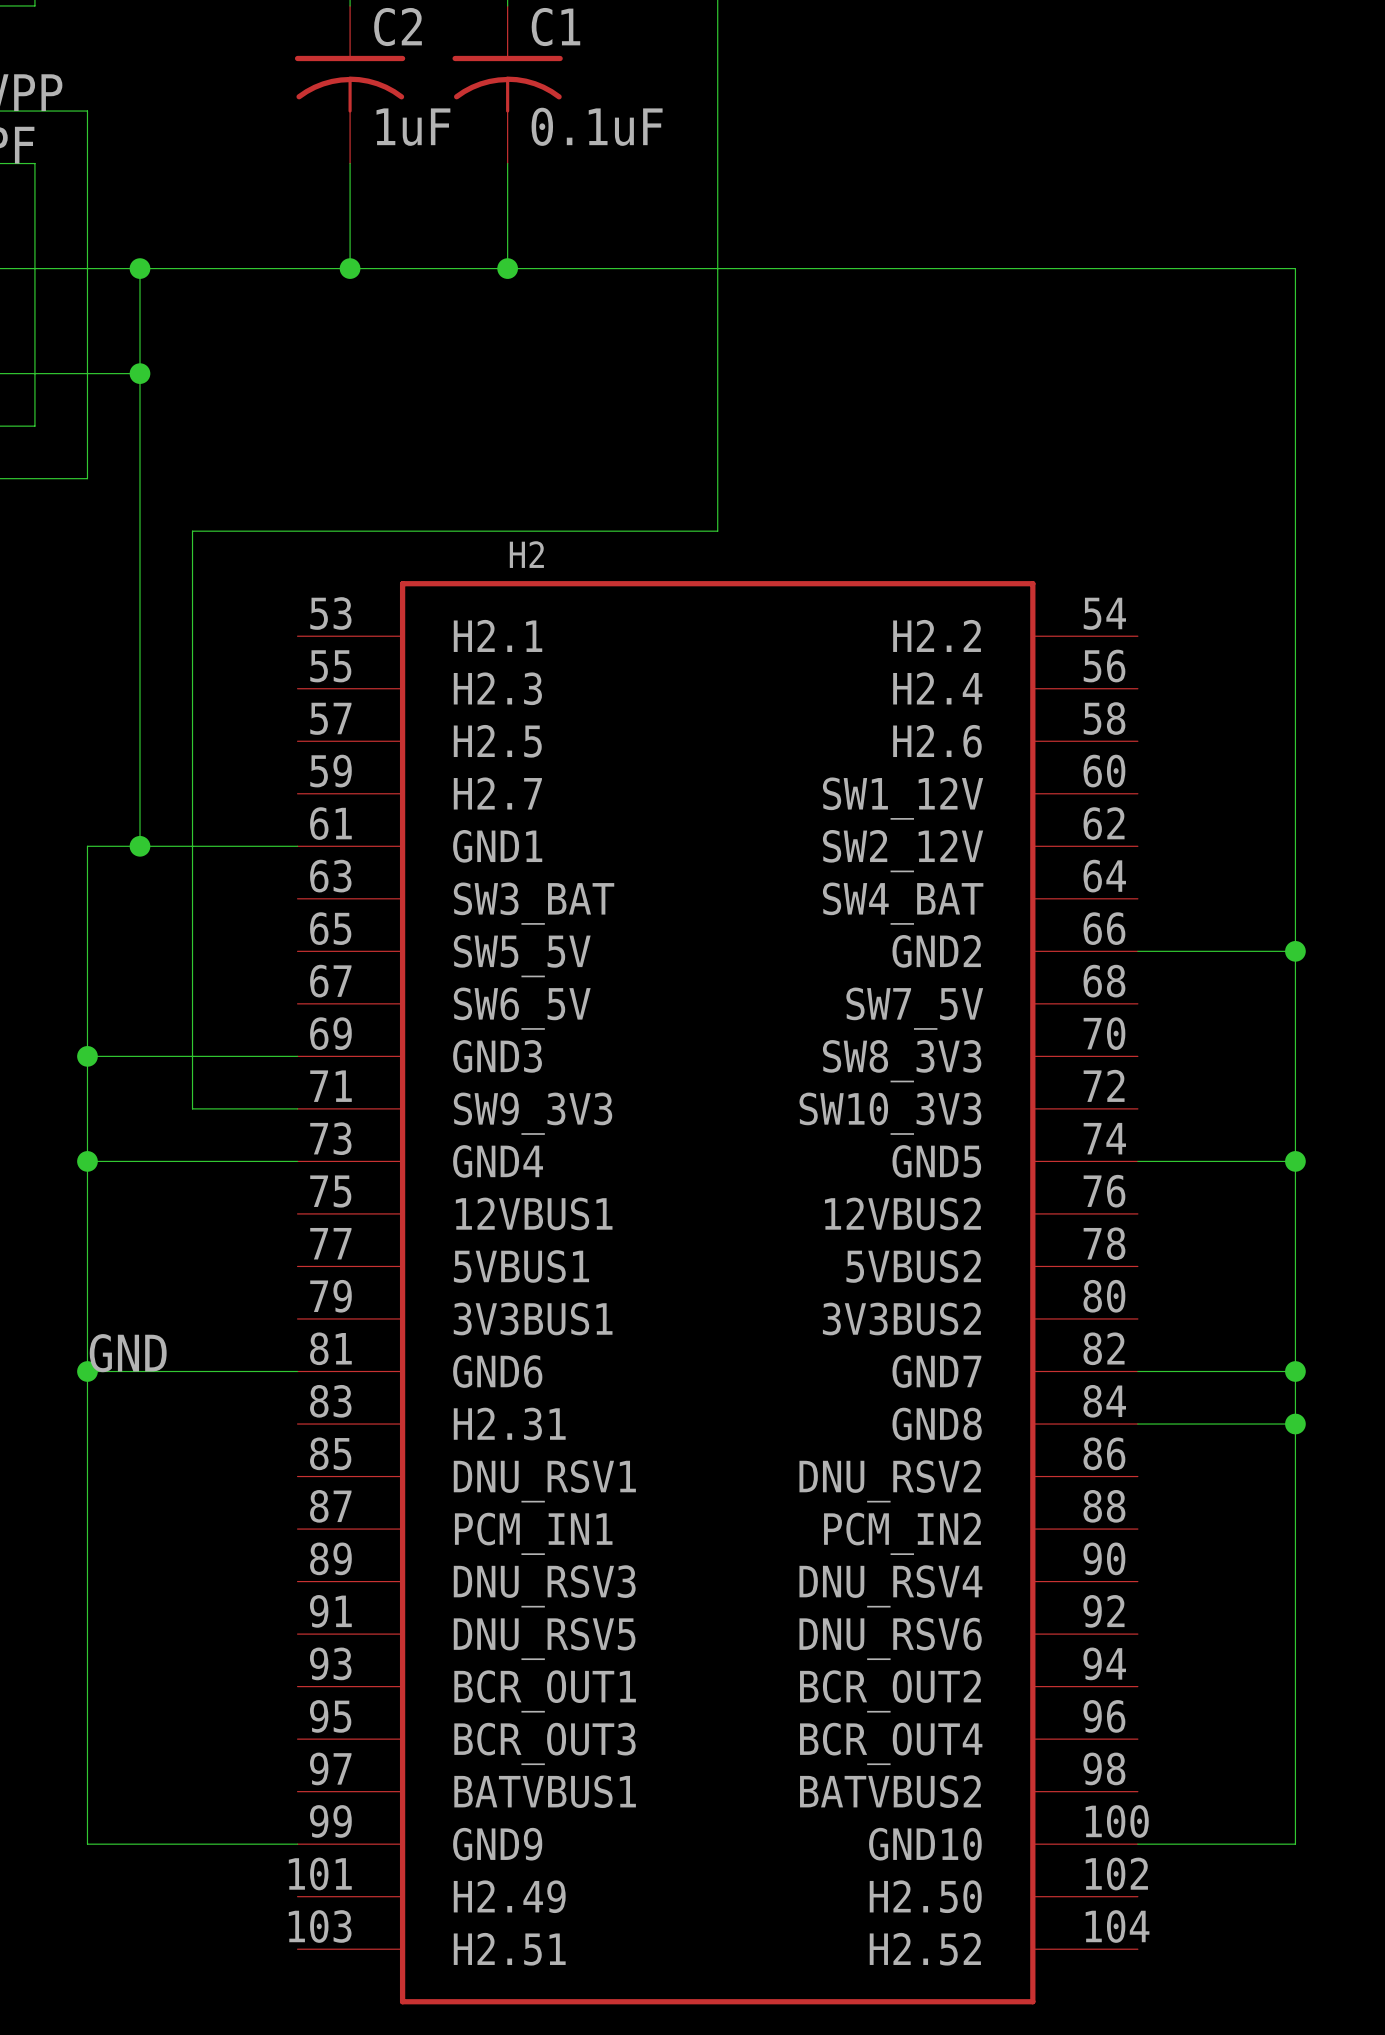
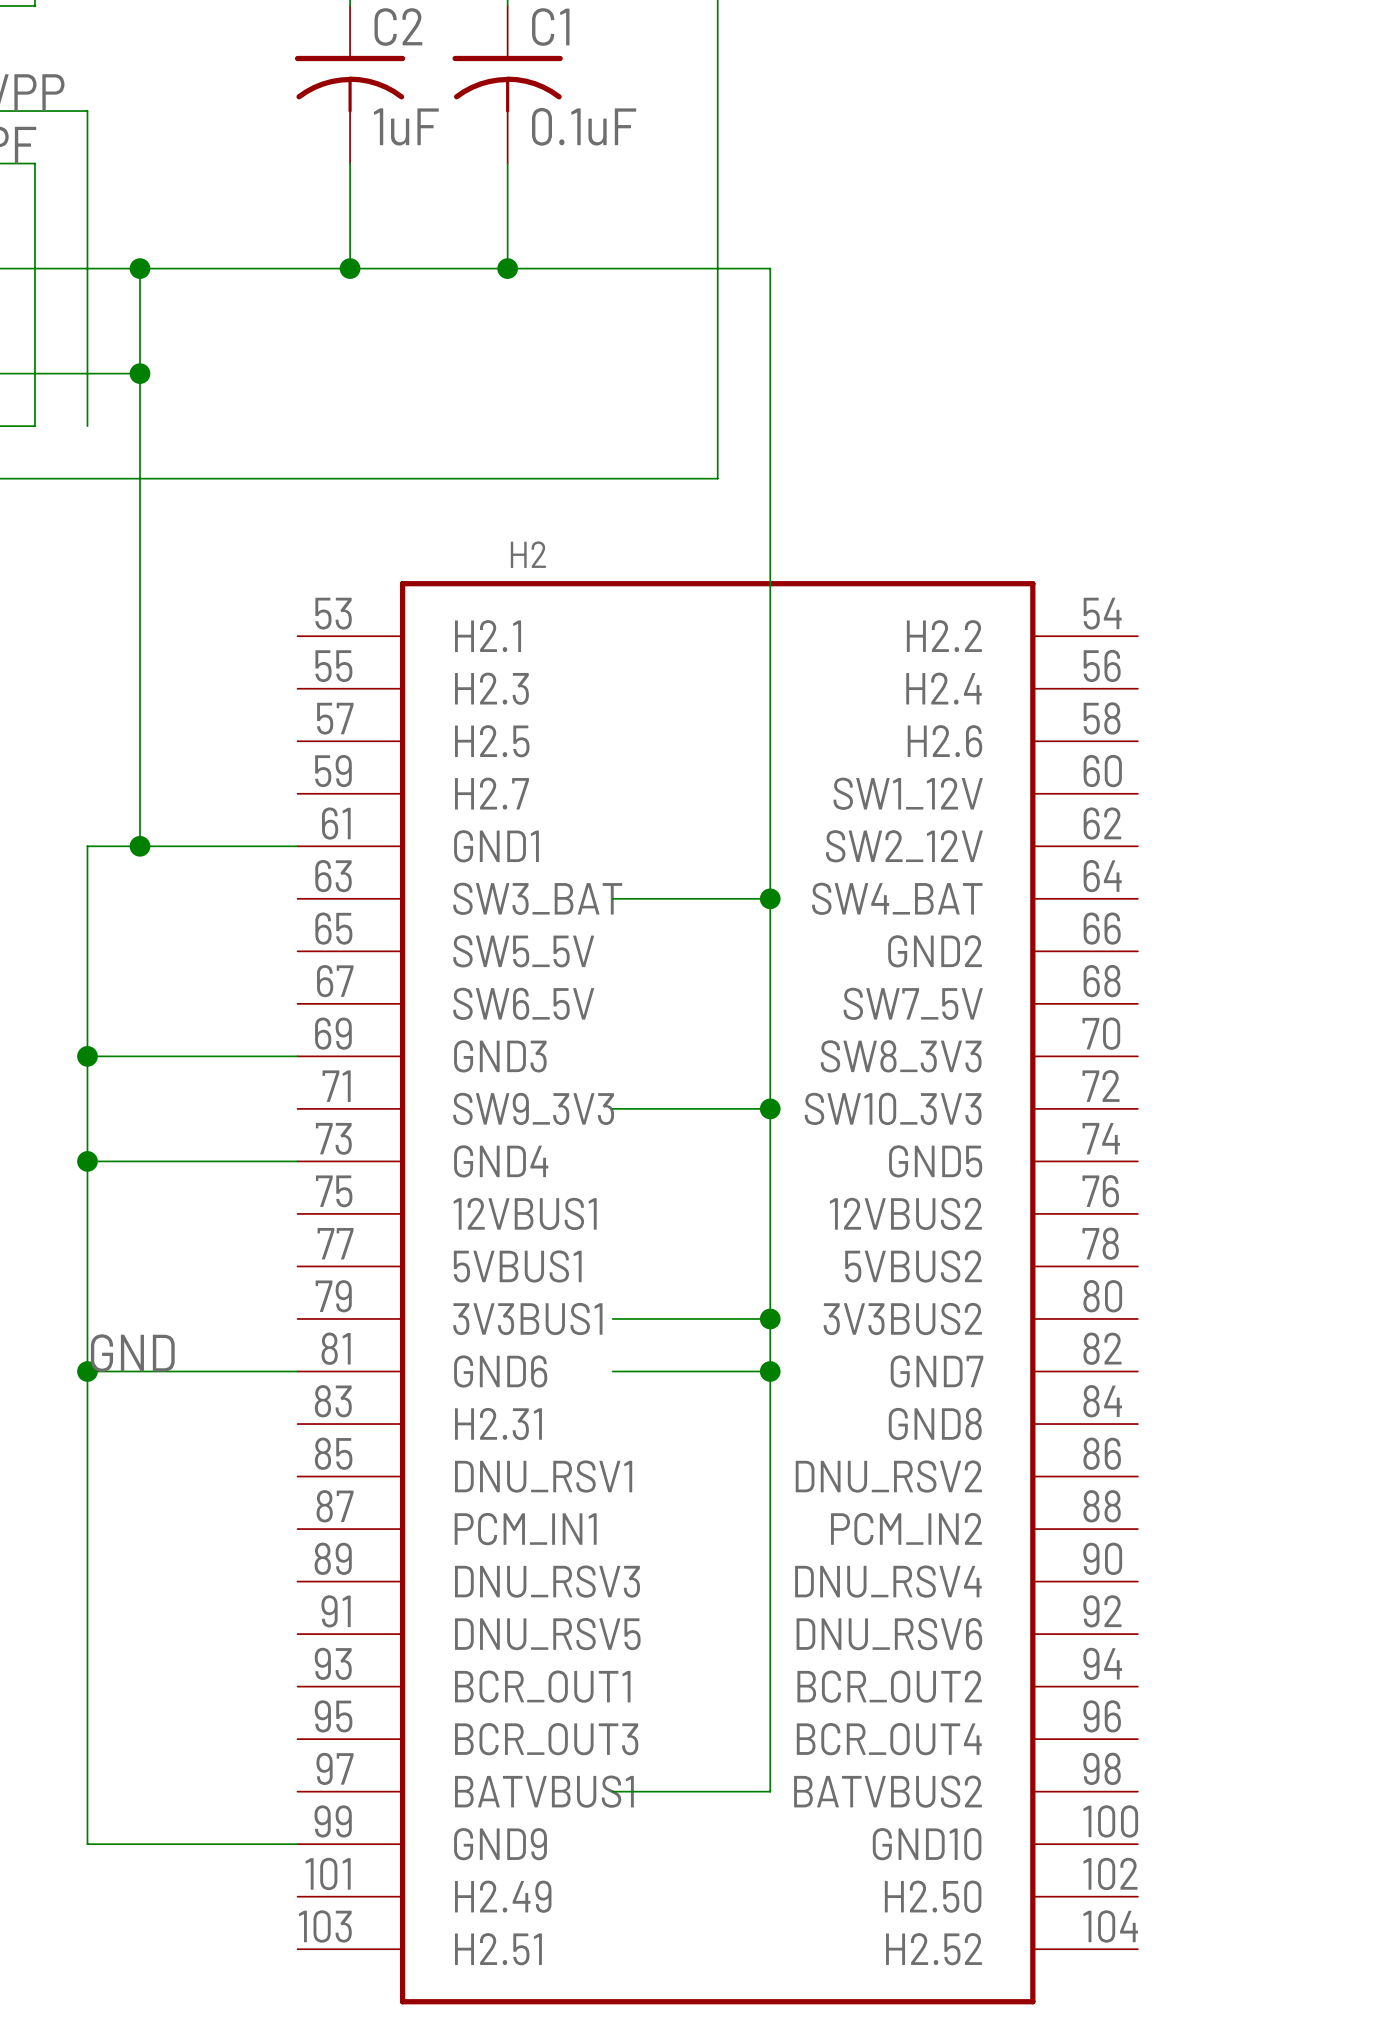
wire: (770, 268) (1295, 268) (1295, 1844) (1137, 1844) -> (770, 268) (770, 1791) (612, 1791)
wire: (87, 426) (87, 478) -> (717, 478) (87, 478)
wire: (717, 478) (717, 531) (192, 531) (192, 1108) (297, 1108) -> none
wire: none -> (612, 898) (770, 898)
junction: none -> (770, 898)
wire: (1137, 951) (1295, 951) -> none
junction: (1295, 951) -> none
wire: none -> (612, 1108) (770, 1108)
junction: none -> (770, 1108)
wire: (1137, 1161) (1295, 1161) -> none
junction: (1295, 1161) -> none
wire: none -> (612, 1318) (770, 1318)
junction: none -> (770, 1318)
wire: none -> (612, 1371) (770, 1371)
junction: none -> (770, 1371)
wire: (1137, 1371) (1295, 1371) -> none
junction: (1295, 1371) -> none
wire: (1137, 1424) (1295, 1424) -> none
junction: (1295, 1424) -> none

